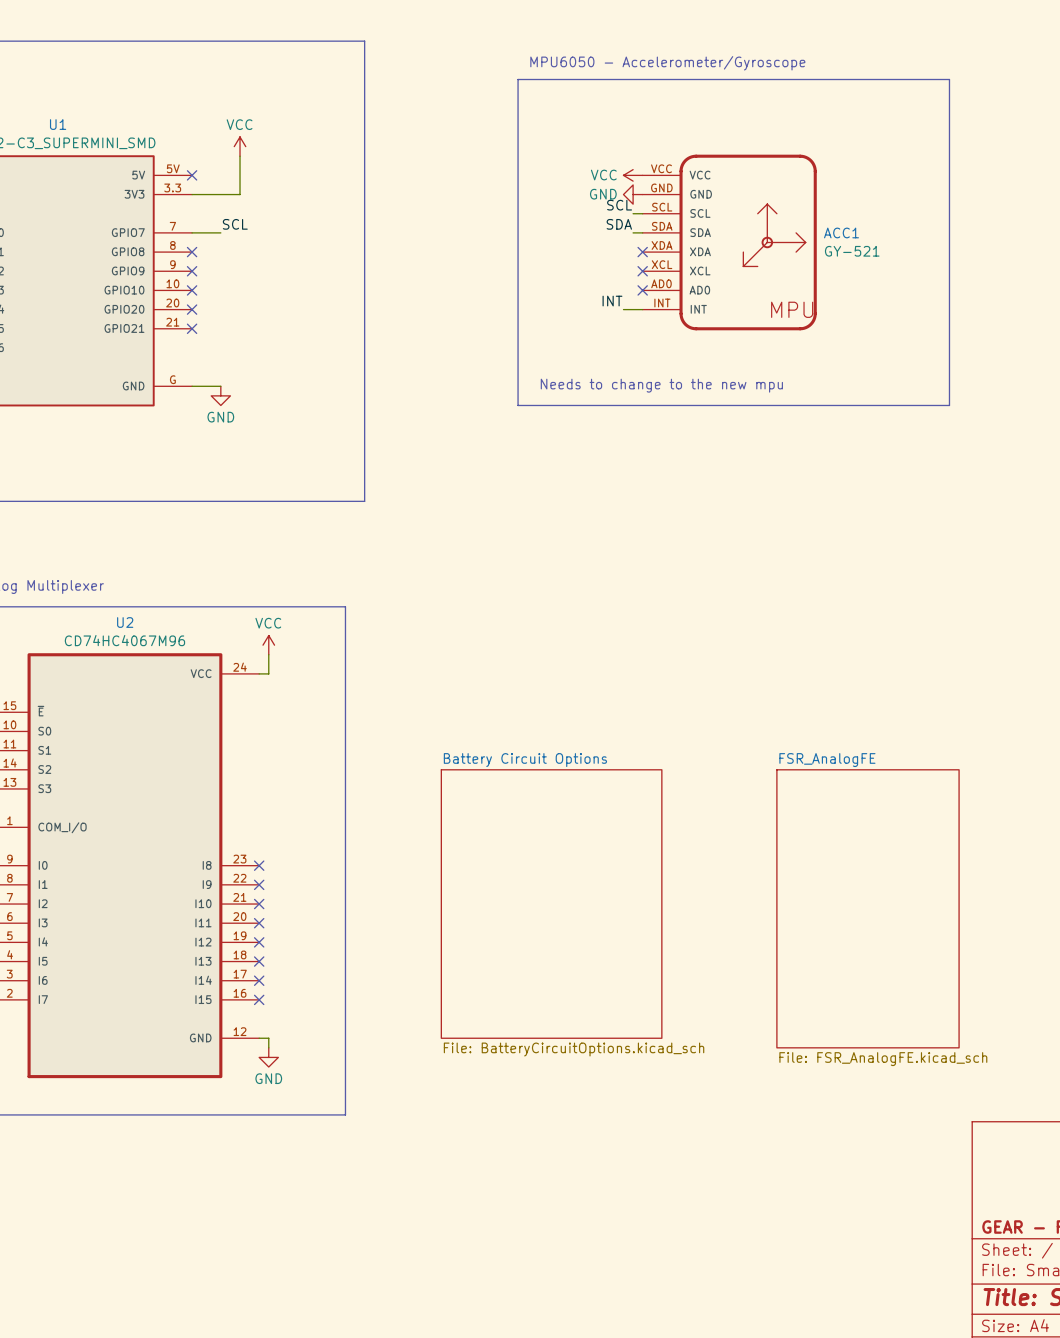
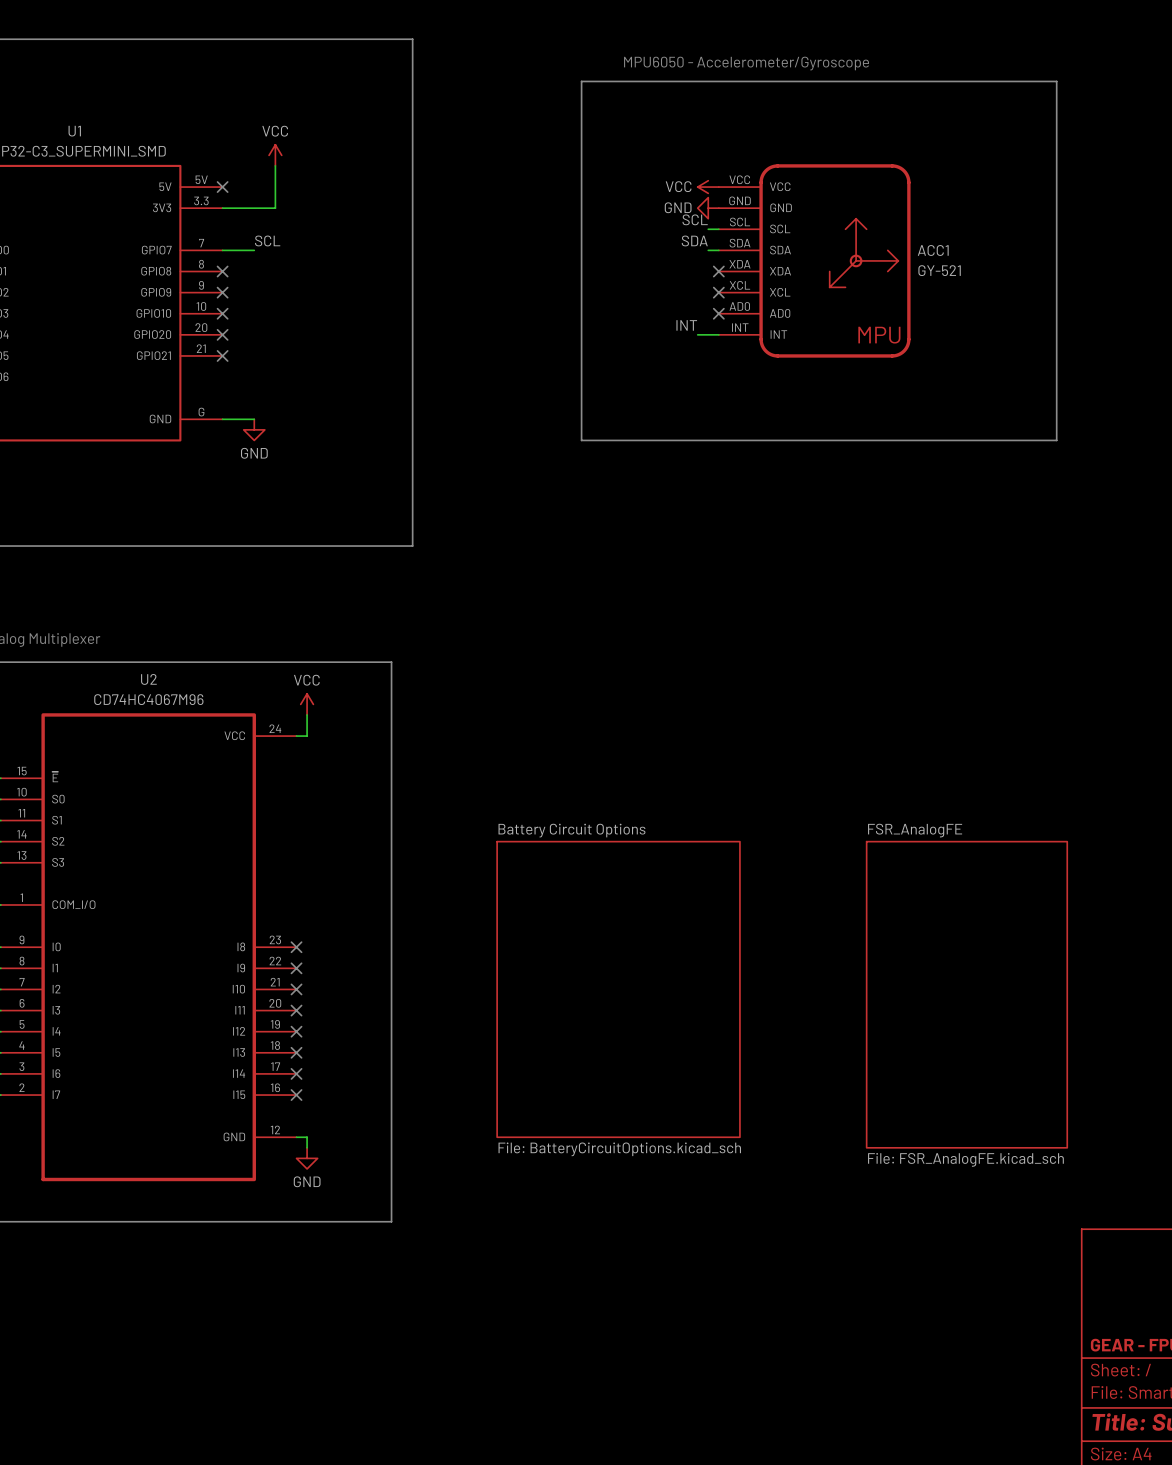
text: Needs to change to the new mpu (661, 385) -> none

